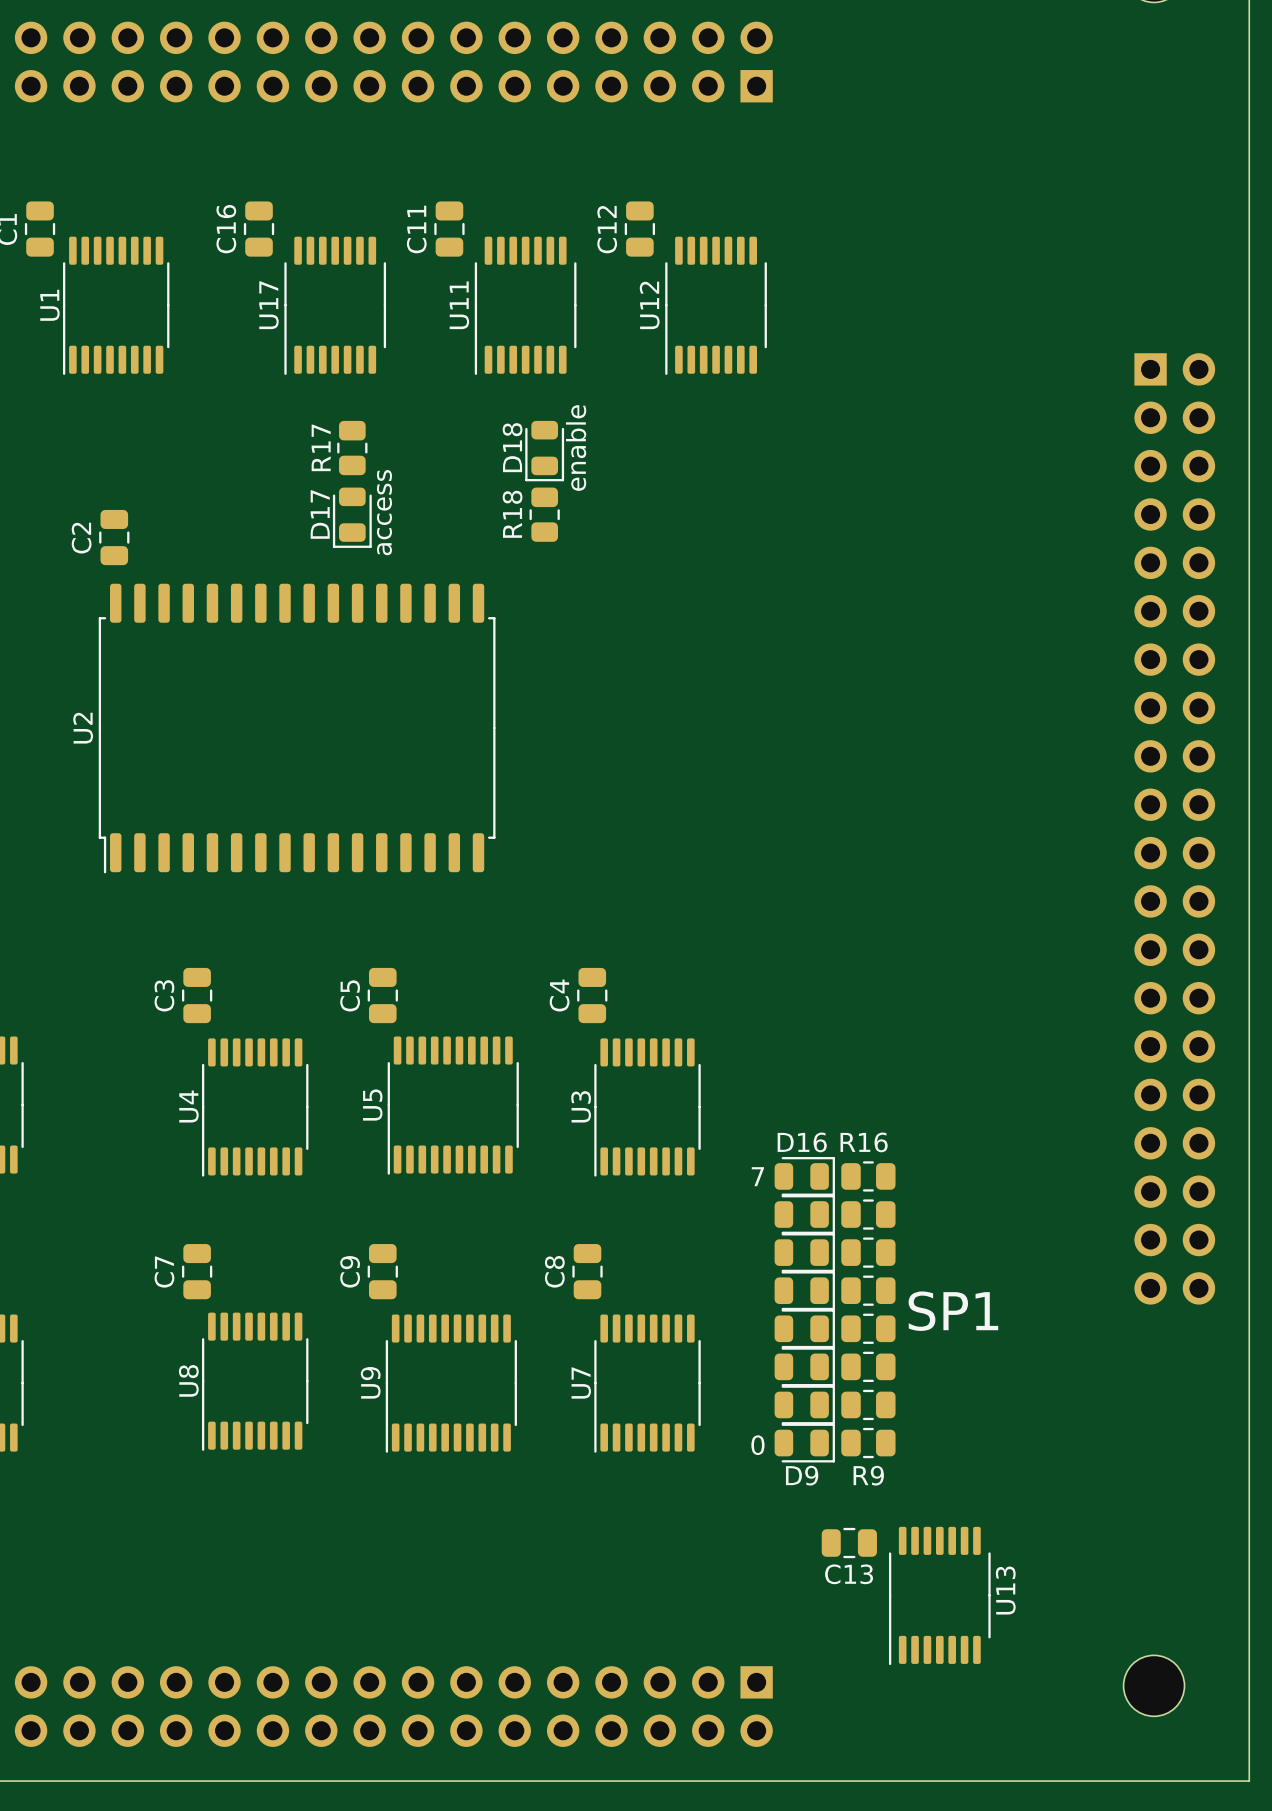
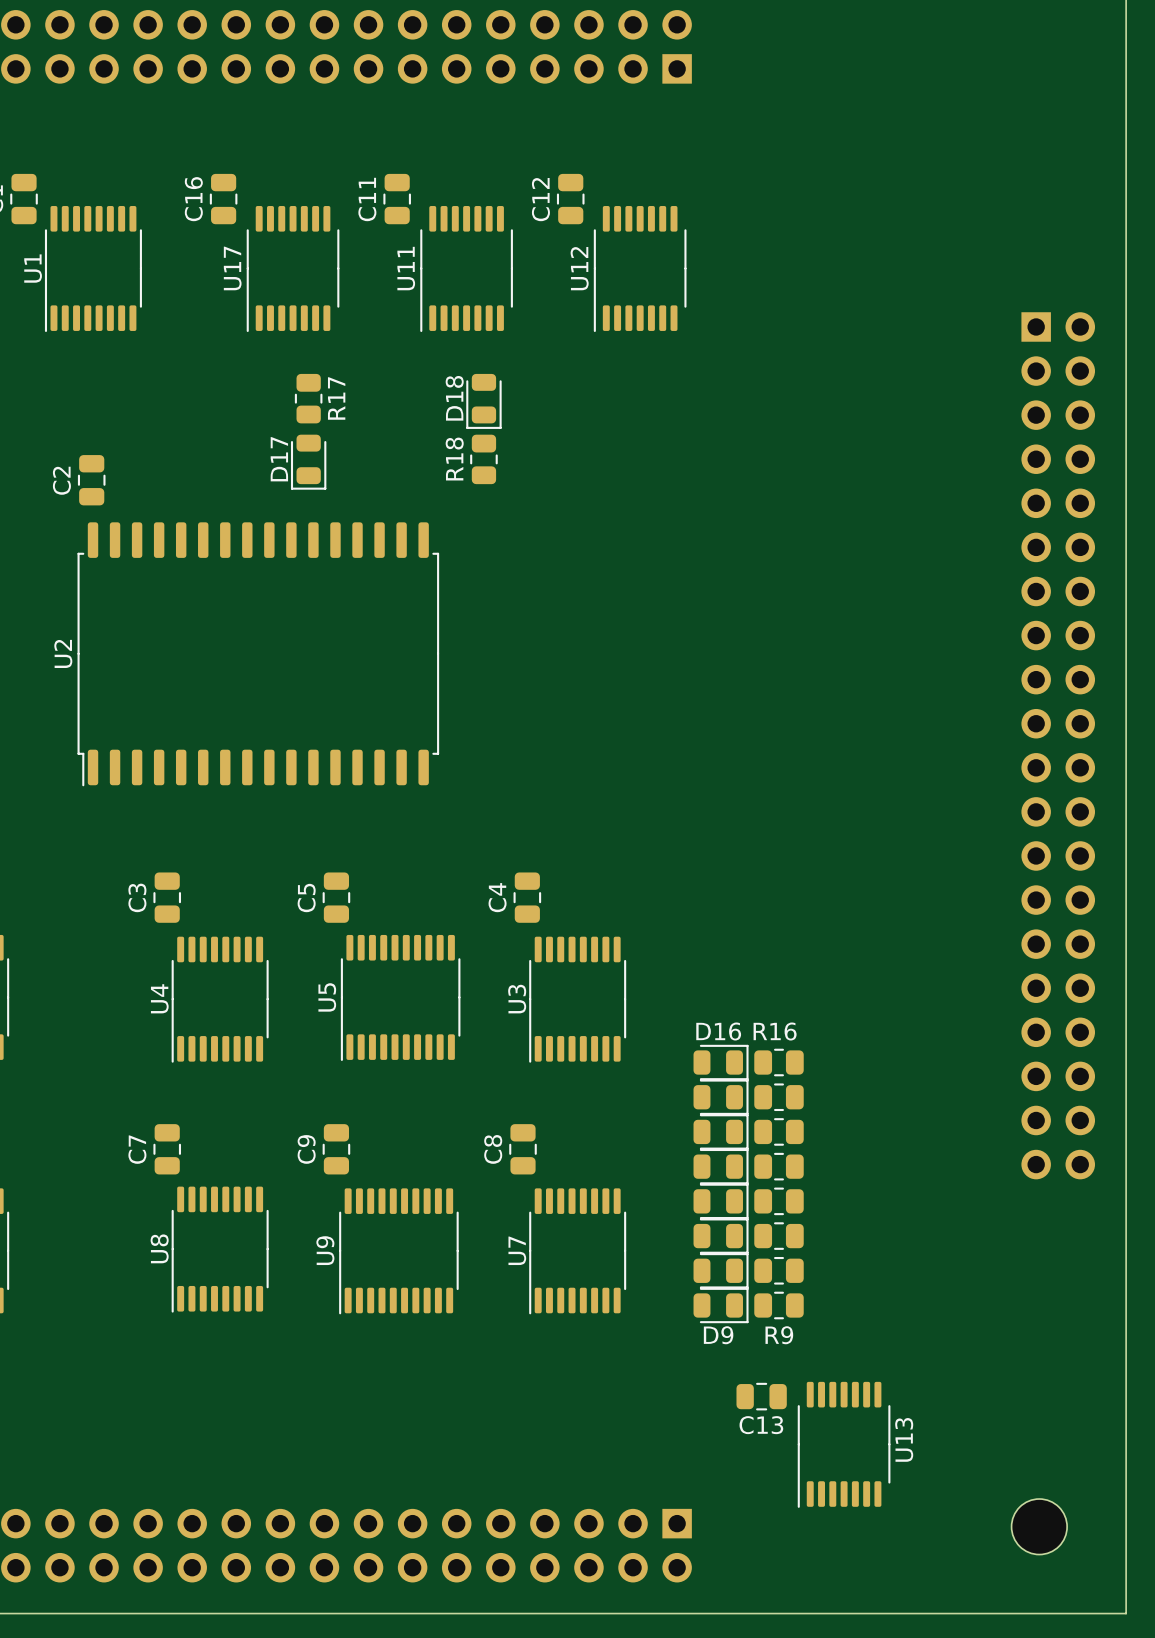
R17 name position: R17 (321, 447) -> R17 (336, 398)
text: enable (576, 448) -> none
text: access (384, 512) -> none
text: 7 (757, 1176) -> none
text: SP1 (953, 1311) -> none
text: 0 (757, 1445) -> none

